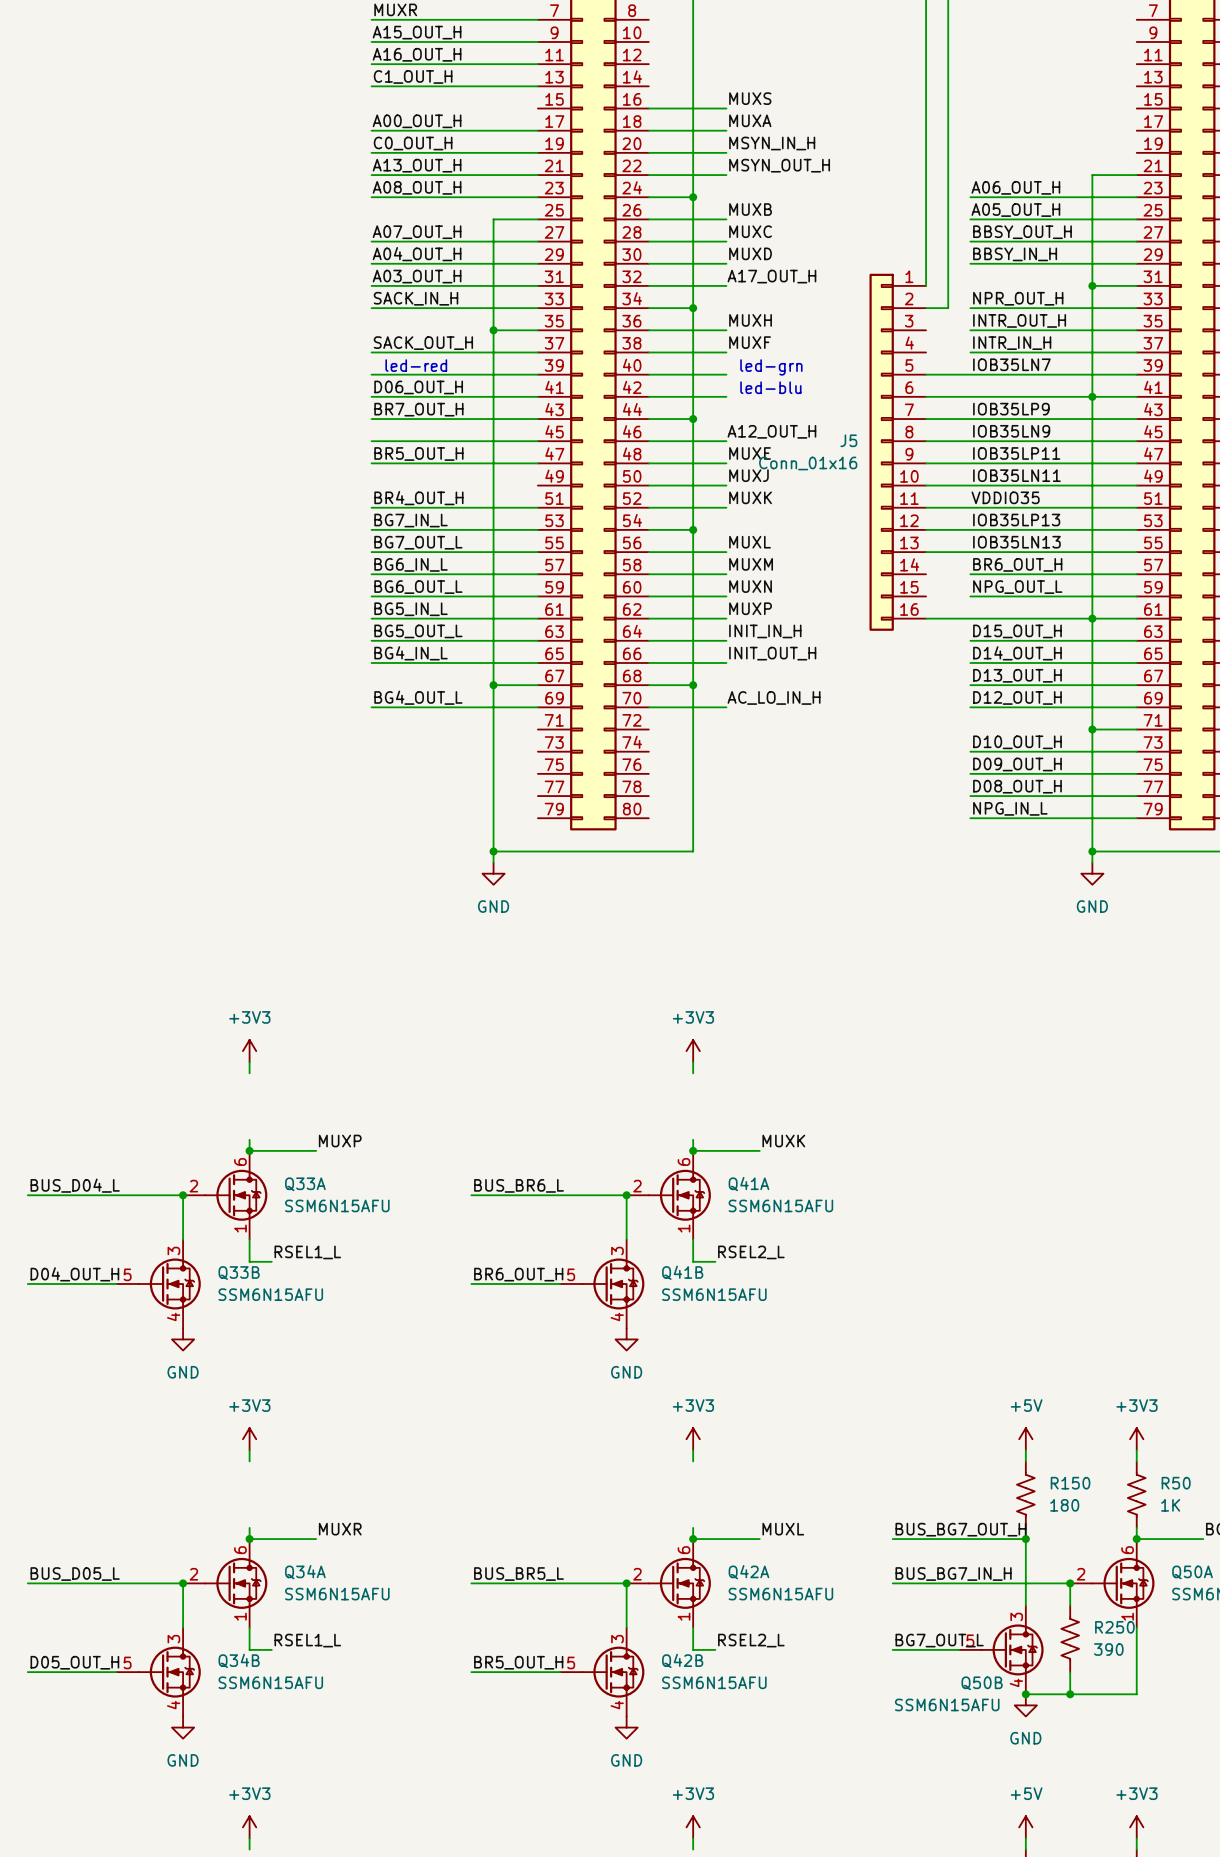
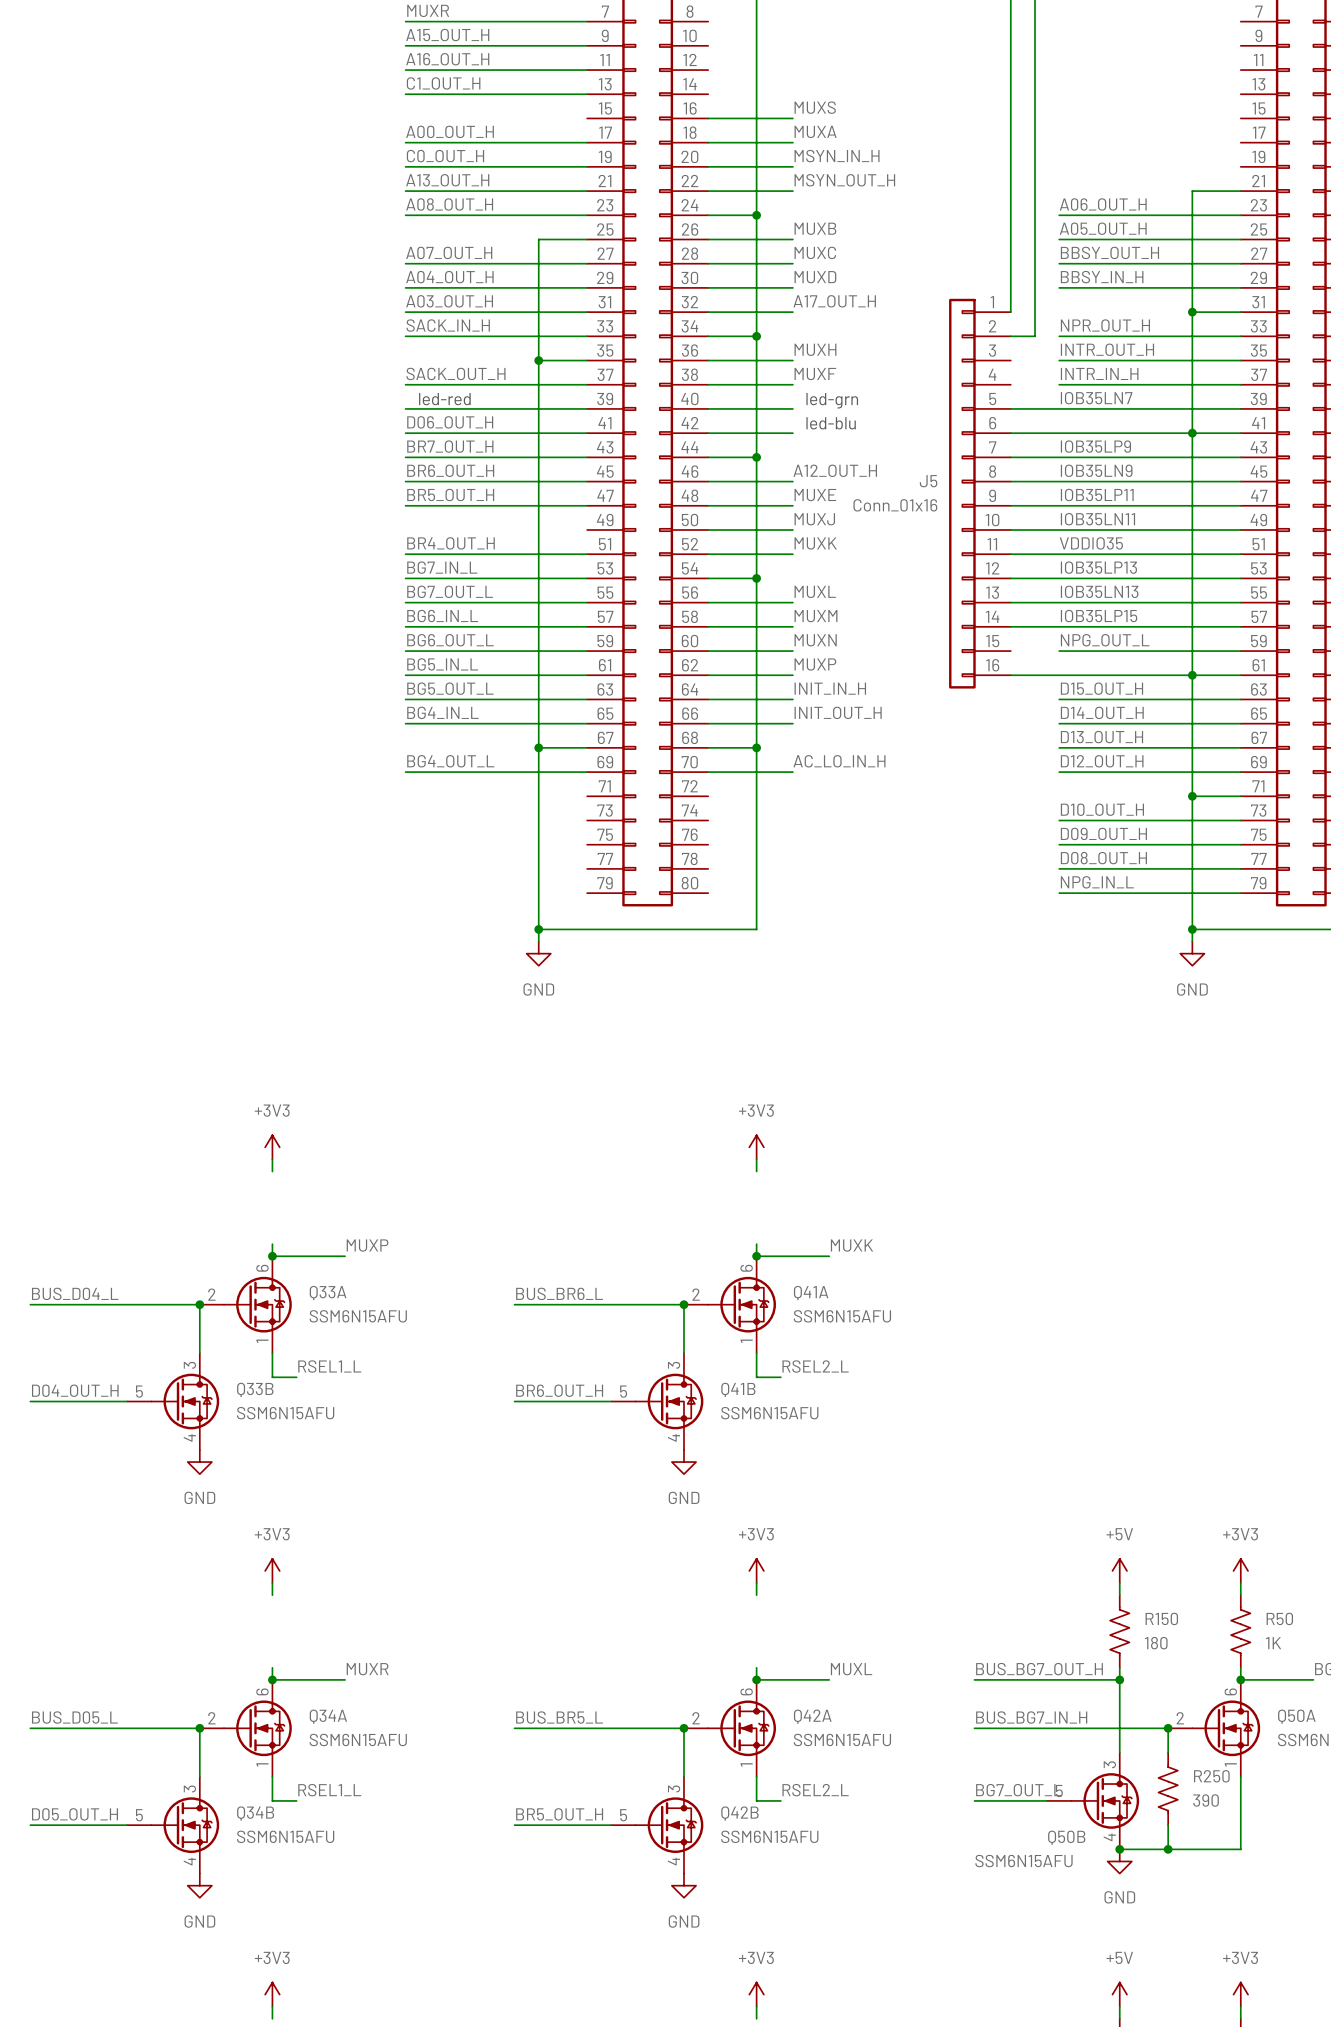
label: none -> BR6_OUT_H (450, 470)
label: BR6_OUT_H (1017, 564) -> IOB35LP15 (1099, 616)
wire: none -> (1010, 626) (1059, 626)

